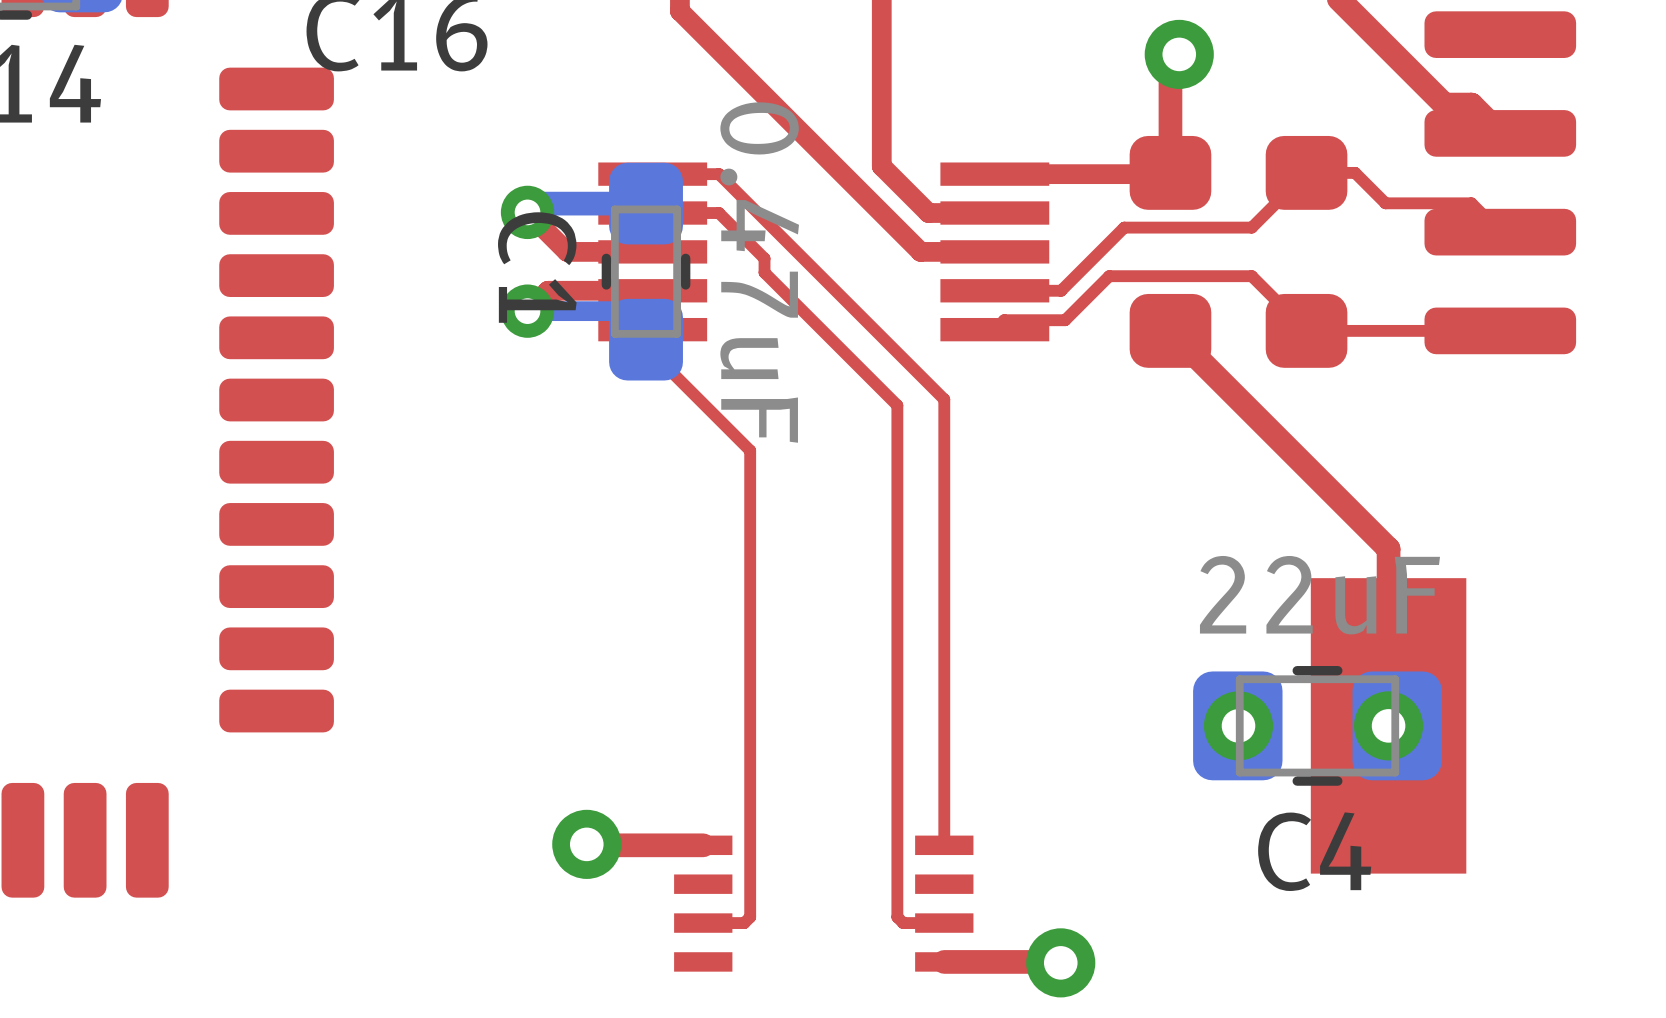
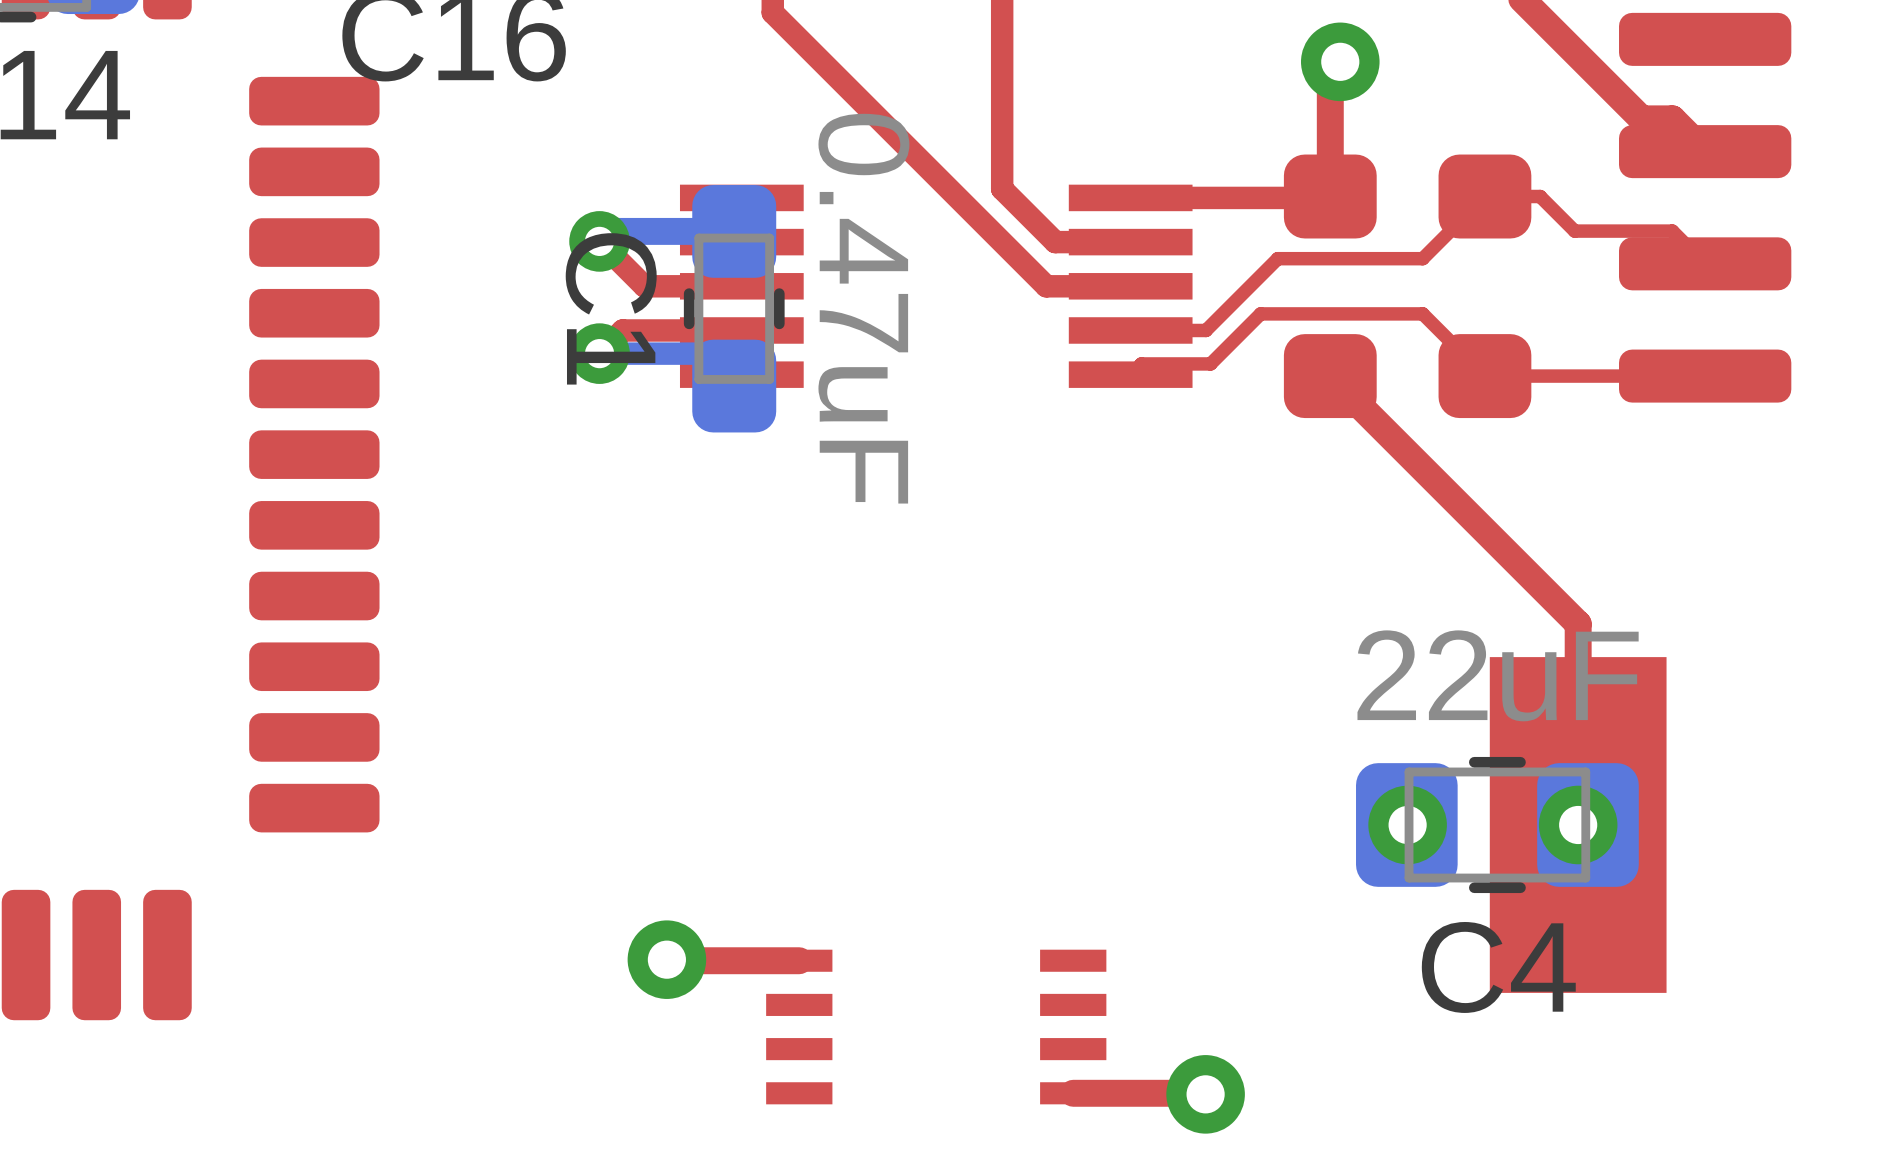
top track: (652, 174) (718, 174) (944, 399) (944, 845) -> none
top track: (652, 213) (718, 213) (764, 258) (764, 272) (897, 405) (897, 917) (903, 923) (944, 923) -> none
top track: (652, 329) (652, 353) (750, 450) (750, 917) (744, 923) (703, 923) -> none

